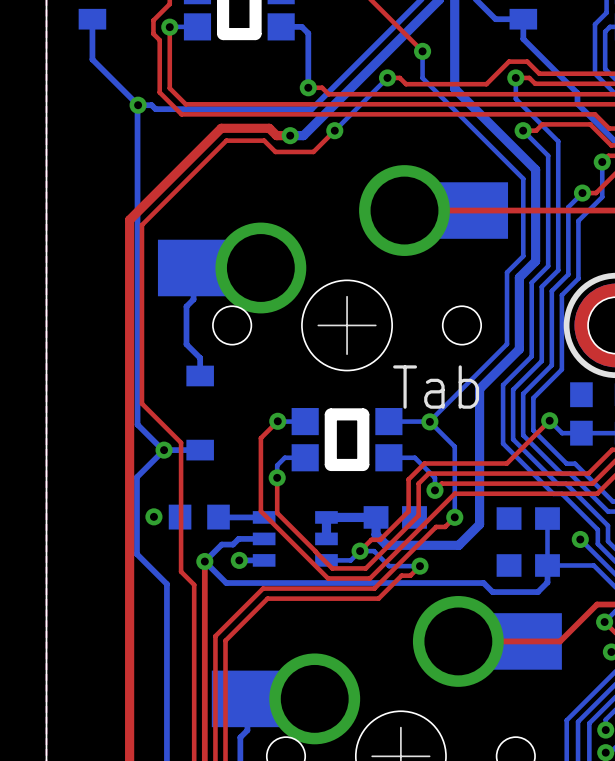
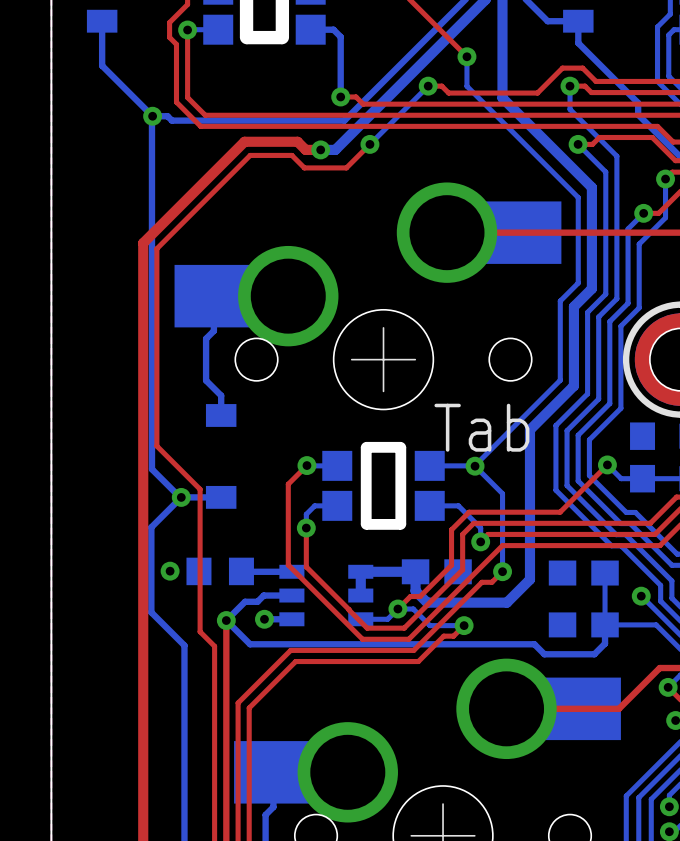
part footprint: [291, 408, 403, 472] -> [322, 442, 445, 529]

